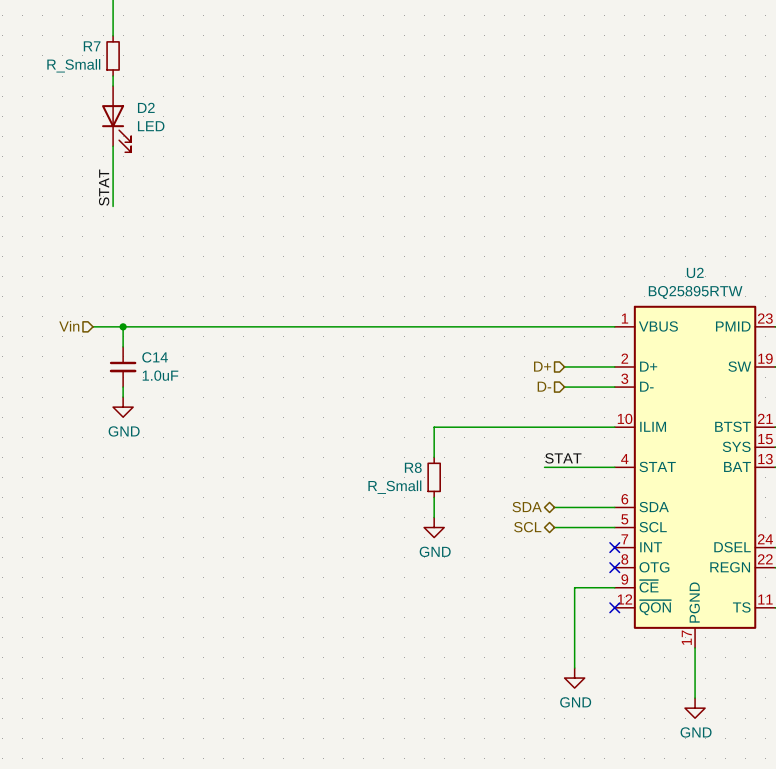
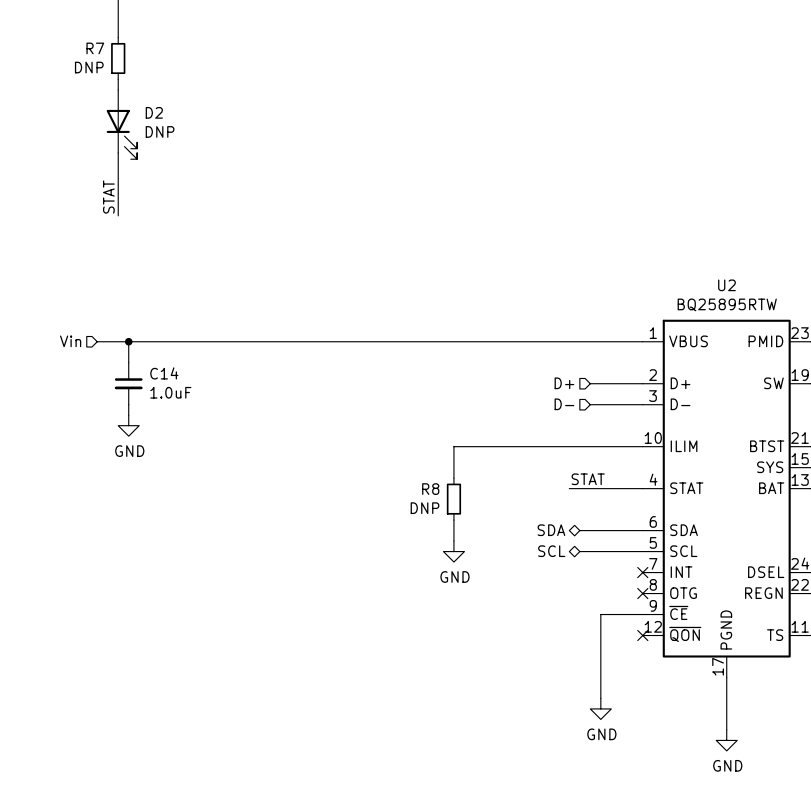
R7 value: R_Small (73, 65) -> DNP (89, 67)
D2 value: LED (151, 126) -> DNP (160, 131)
R8 value: R_Small (394, 487) -> DNP (425, 508)

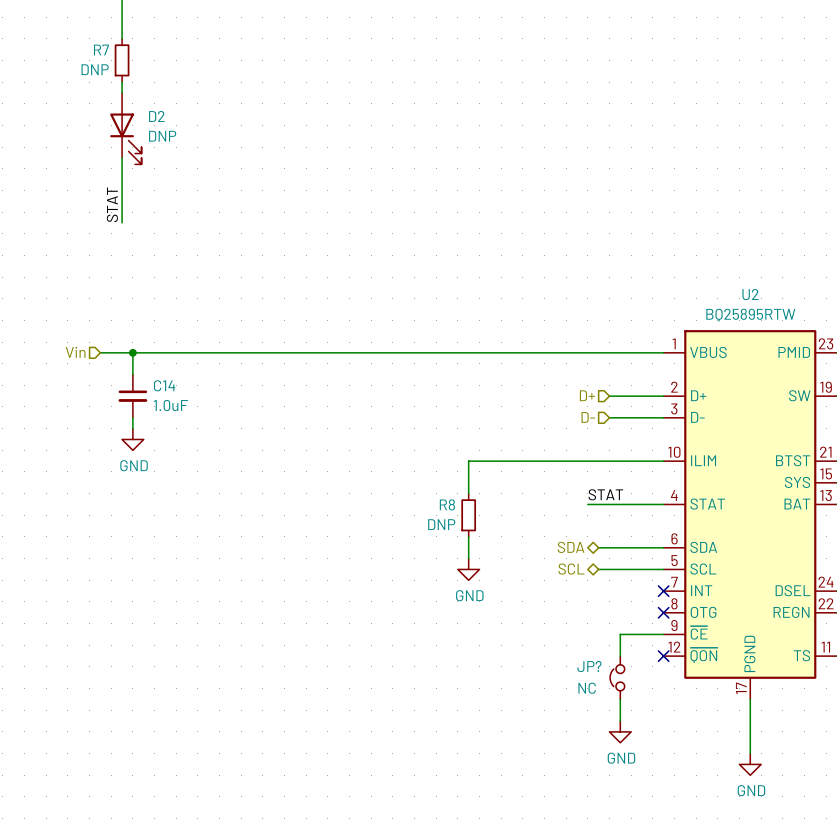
JP?: none -> NC (617, 677)

